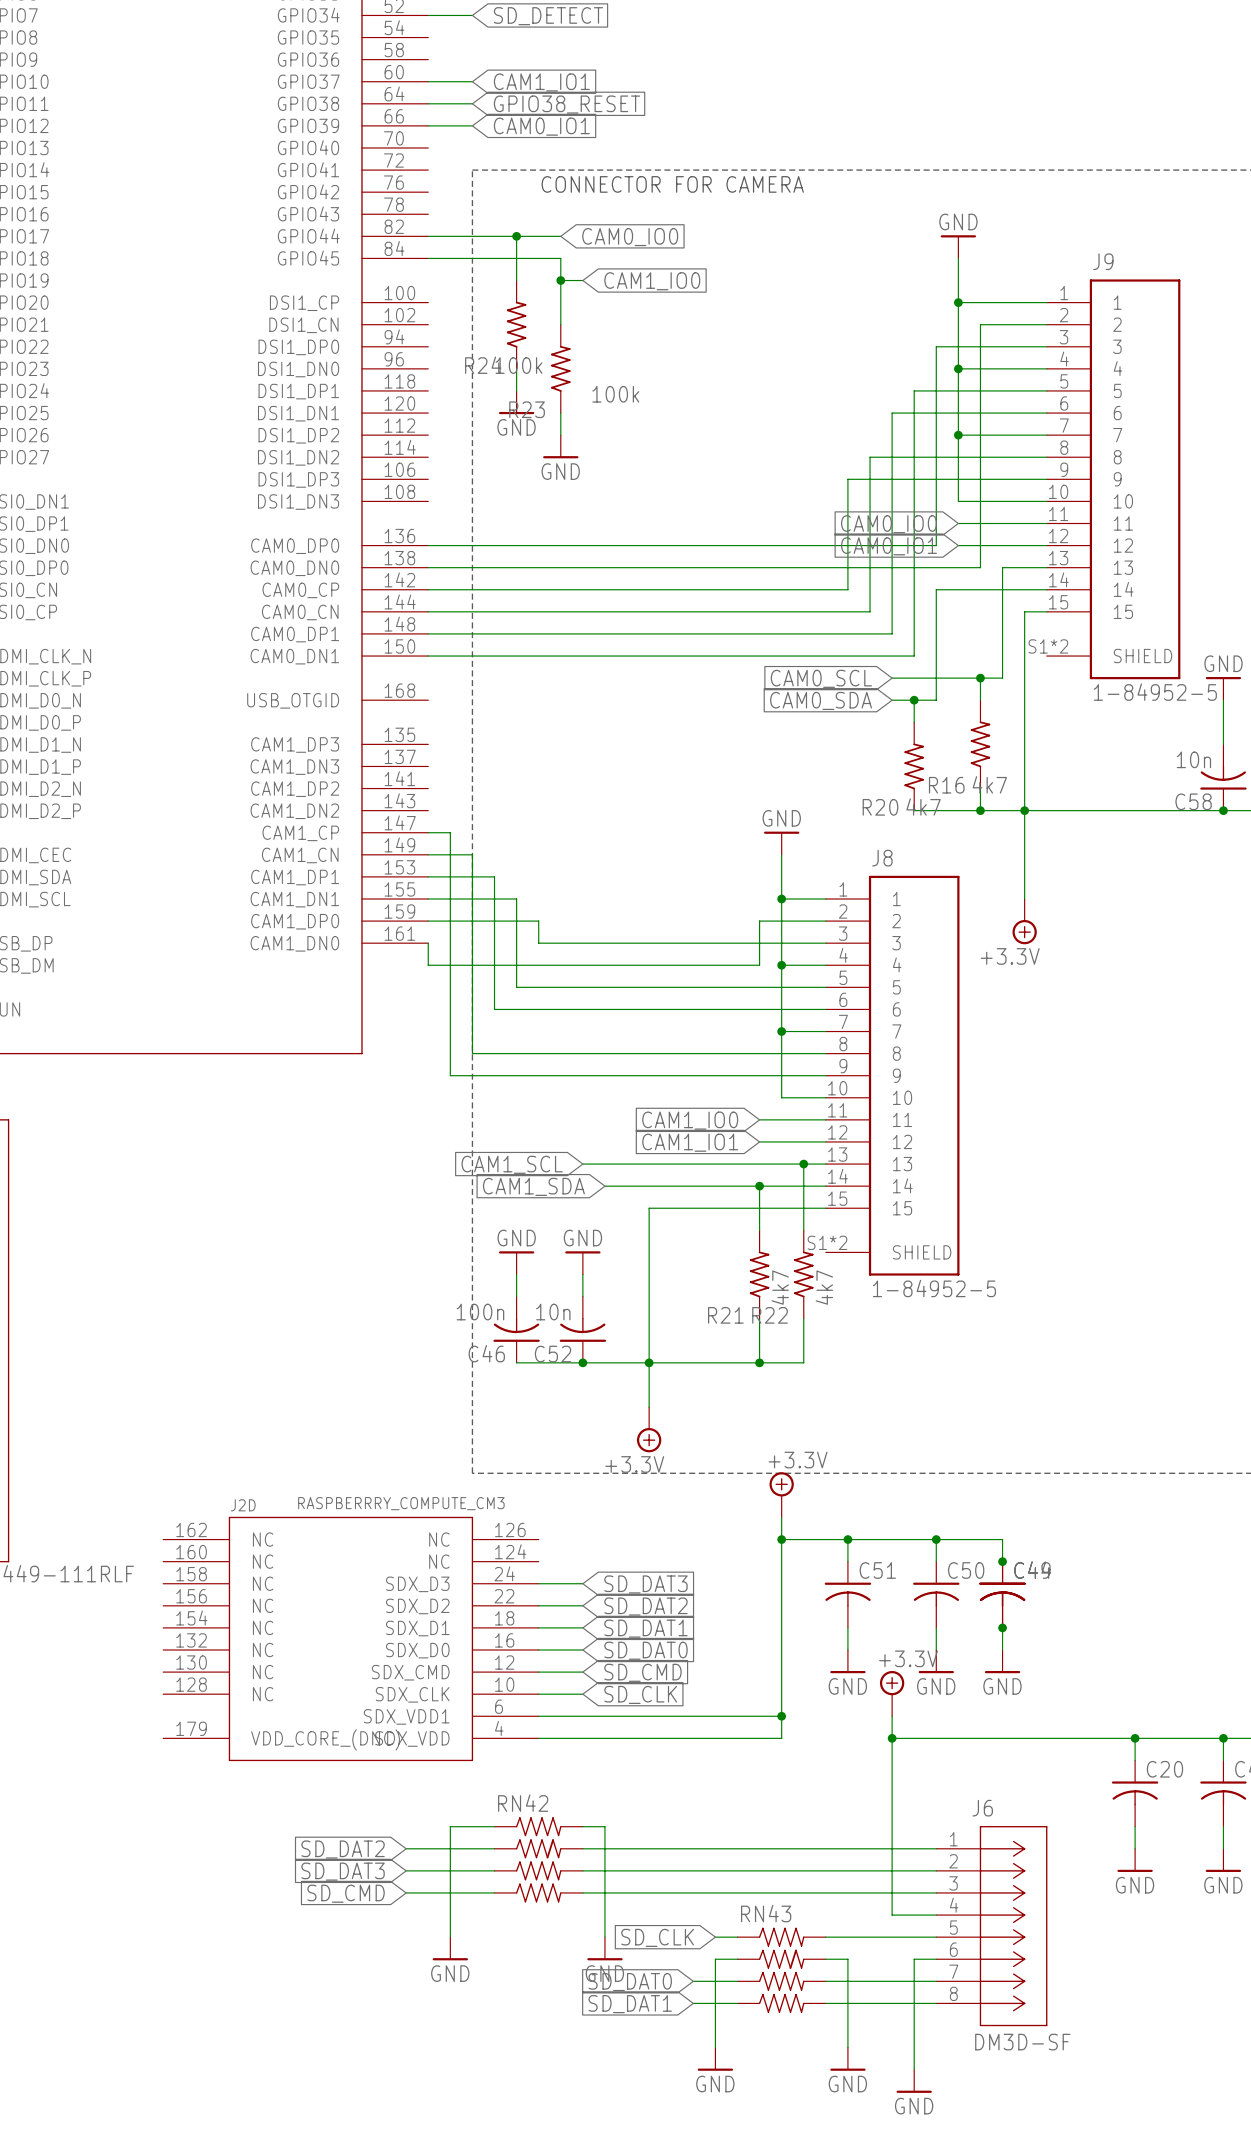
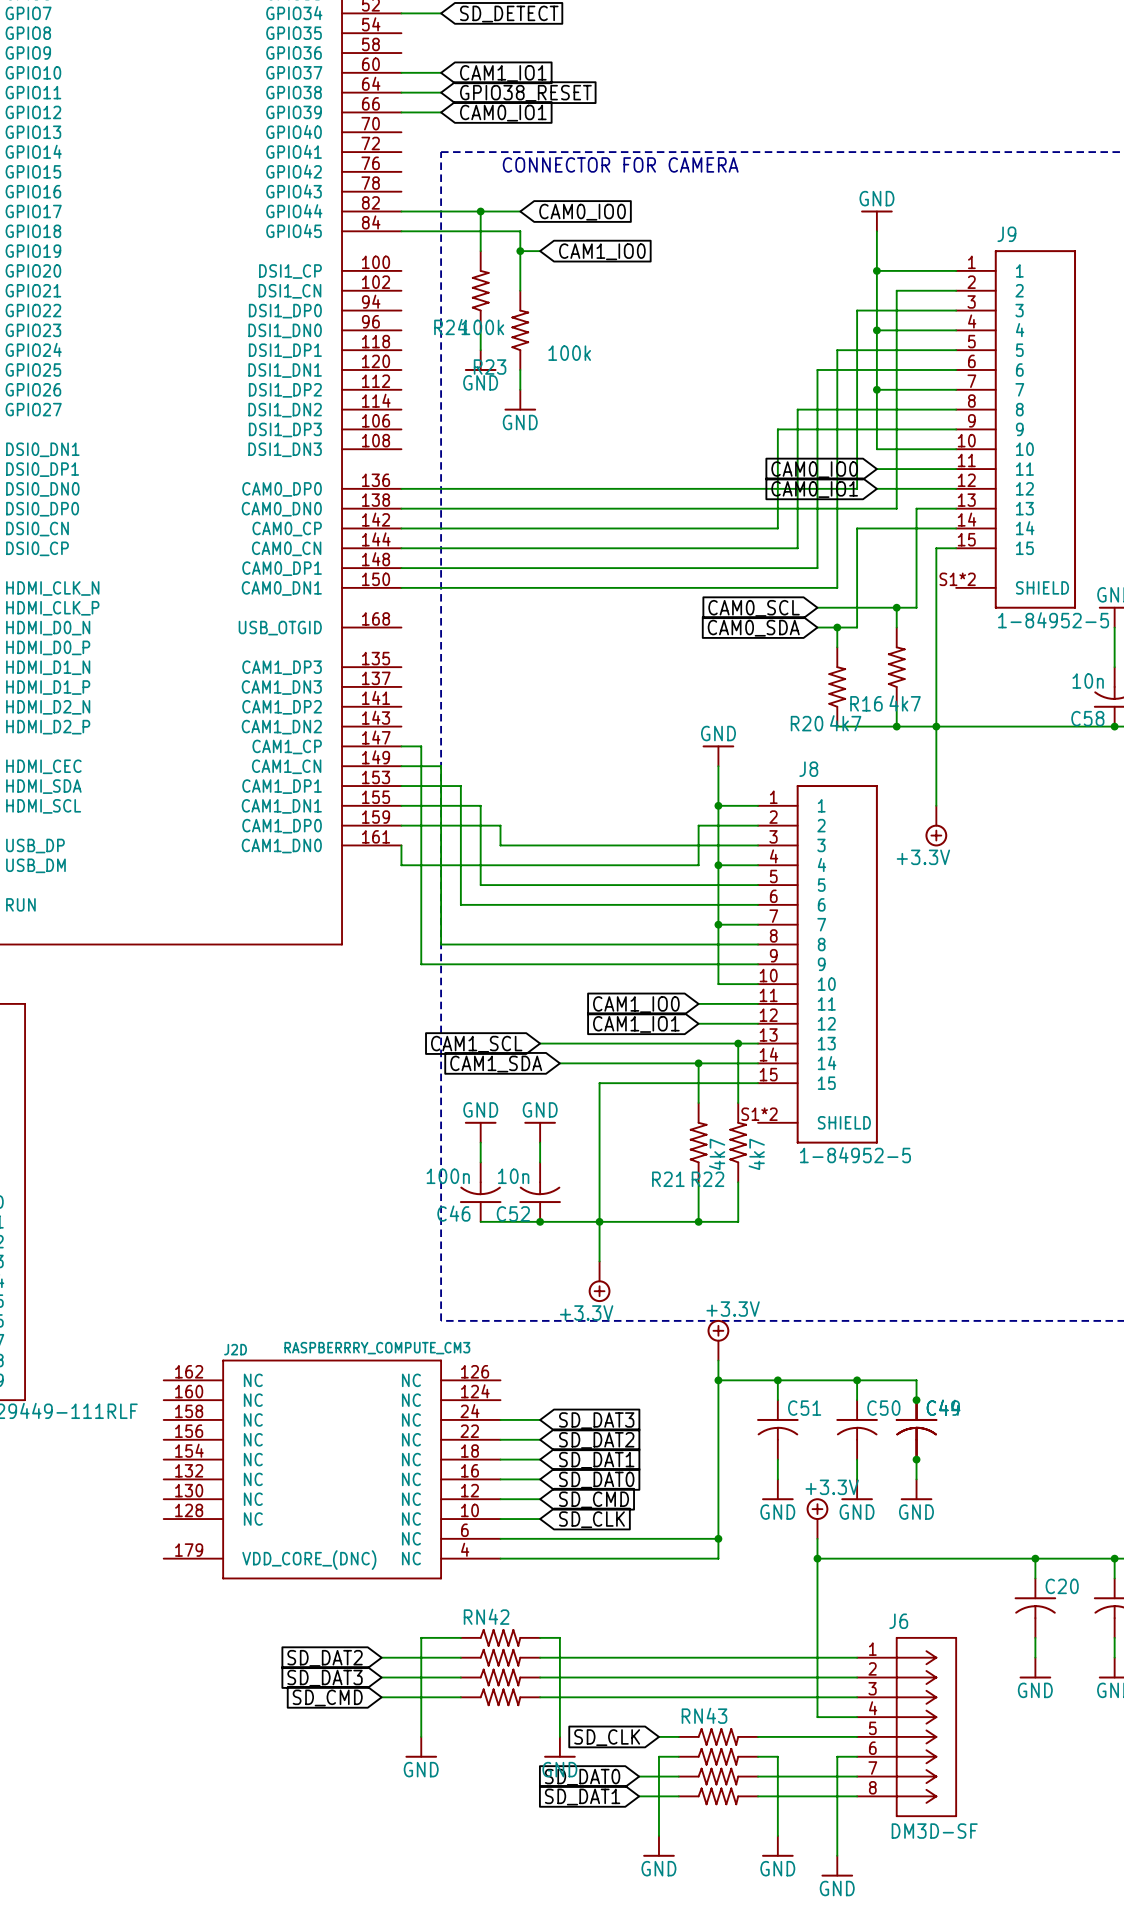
J2D pin name: SDX_D3 (417, 1584) -> NC (411, 1419)
J2D pin name: SDX_D2 (417, 1606) -> NC (411, 1439)
J2D pin name: SDX_D1 (417, 1628) -> NC (411, 1459)
J2D pin name: SDX_D0 (417, 1650) -> NC (411, 1479)
J2D pin name: SDX_CMD (410, 1672) -> NC (411, 1499)
J2D pin name: SDX_CLK (412, 1694) -> NC (411, 1519)
J2D pin name: SDX_VDD1 (406, 1716) -> NC (411, 1538)
J2D pin name: SDX_VDD (412, 1738) -> NC (411, 1558)

